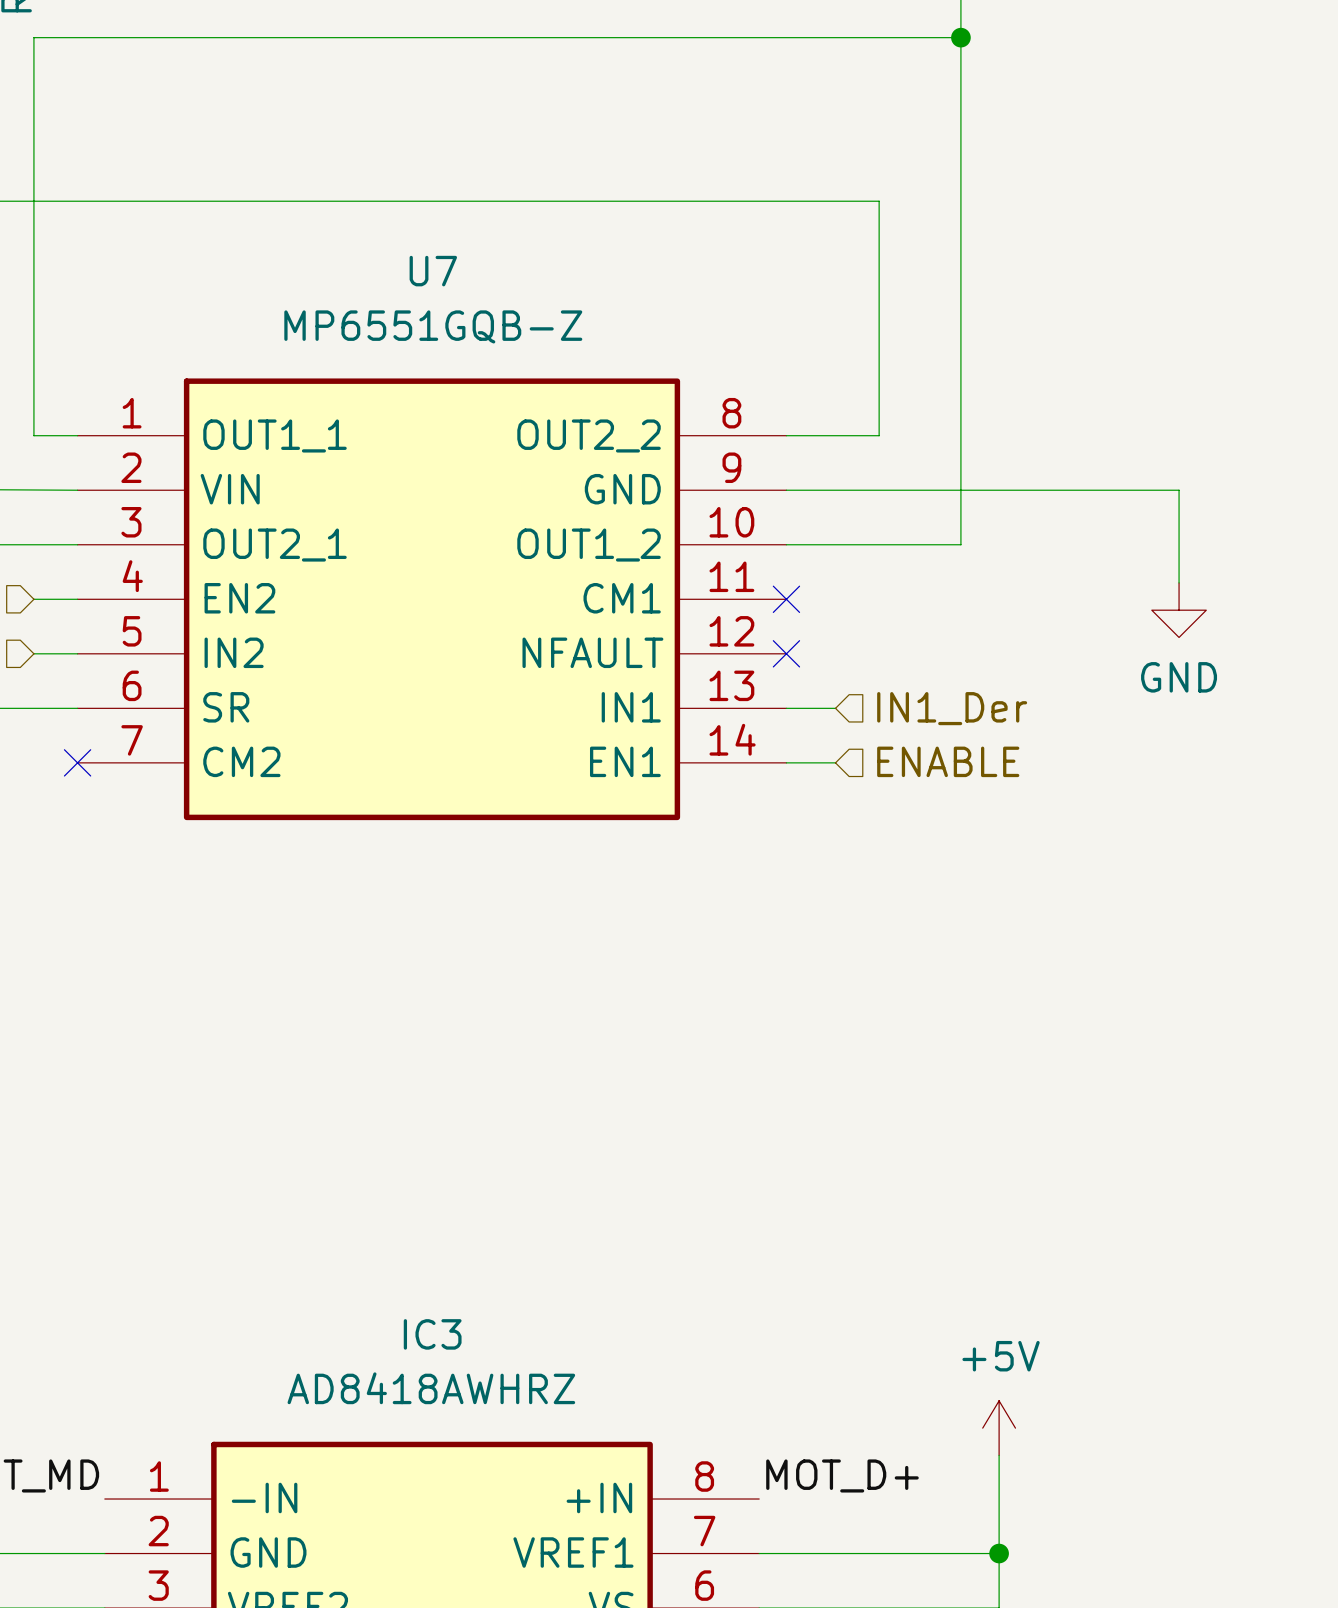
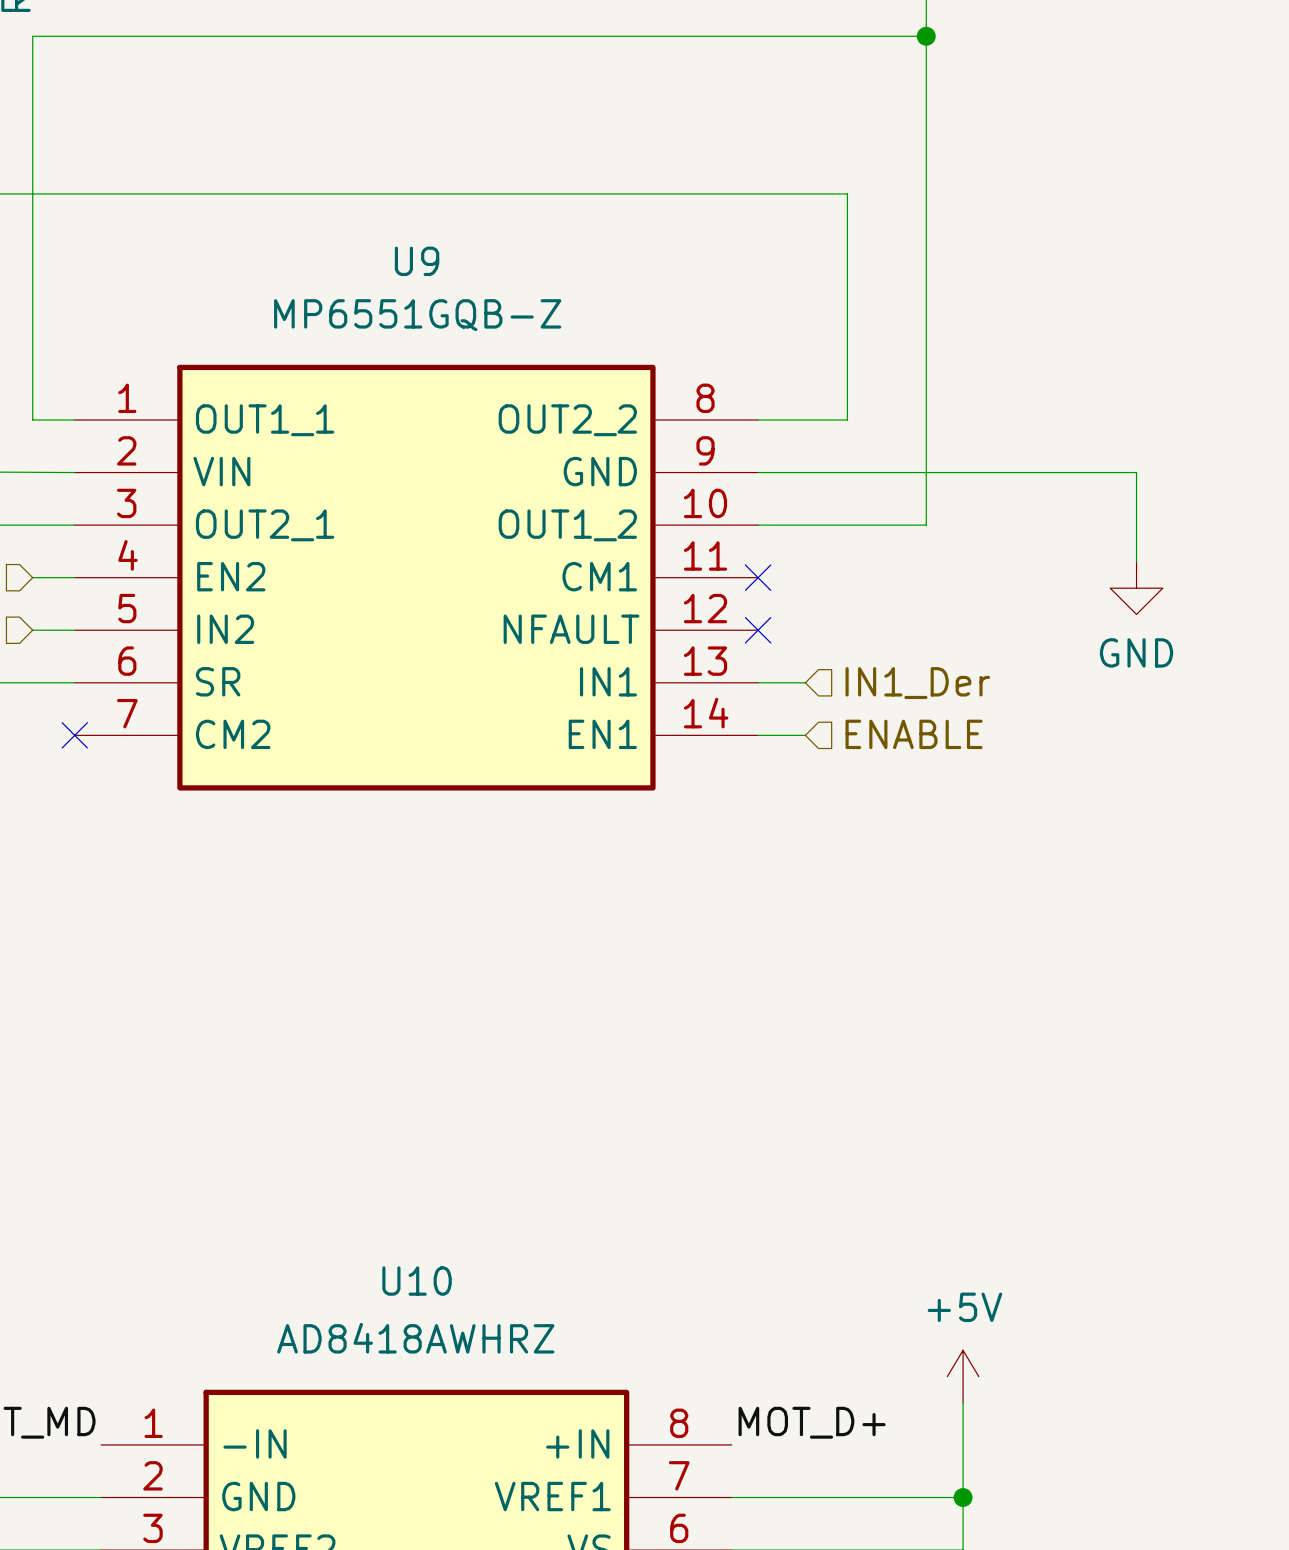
U7 name: U7 (433, 271) -> U9 (417, 261)
IC3 name: IC3 (432, 1334) -> U10 (417, 1281)

